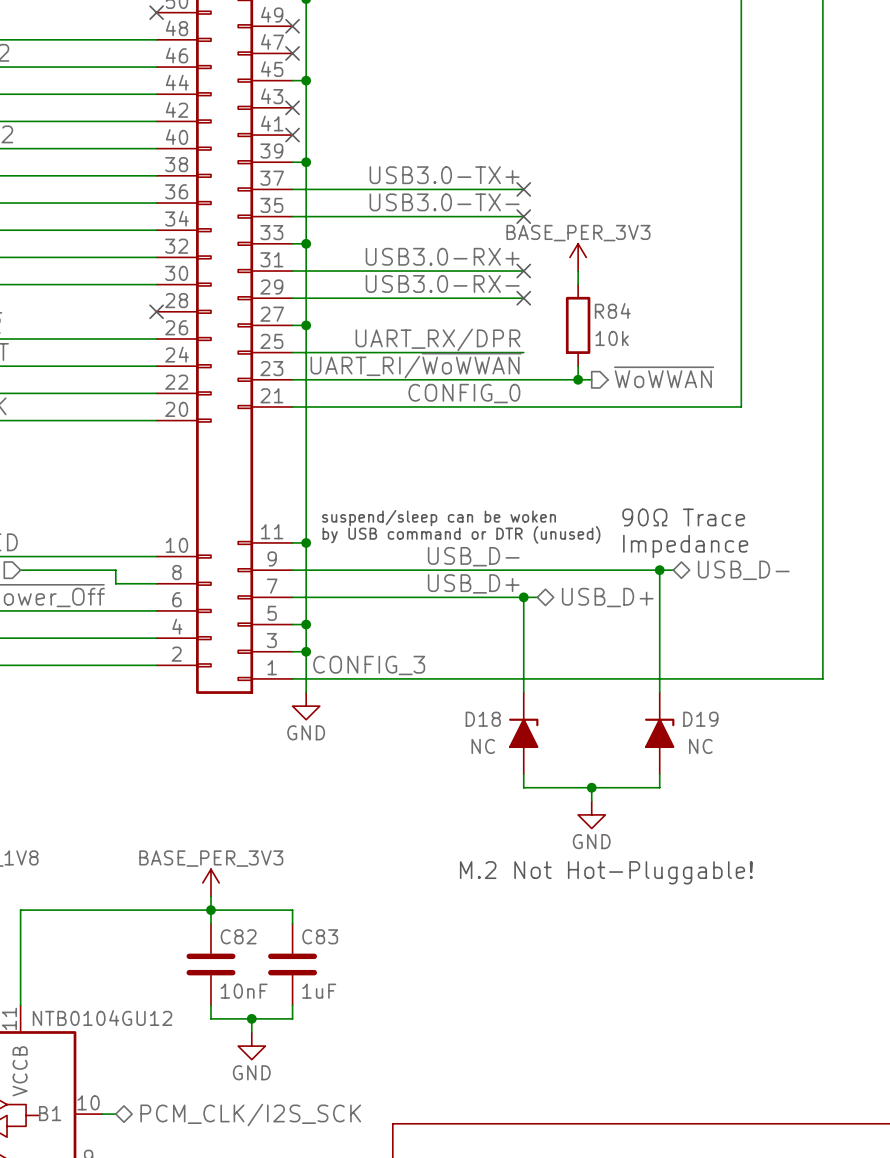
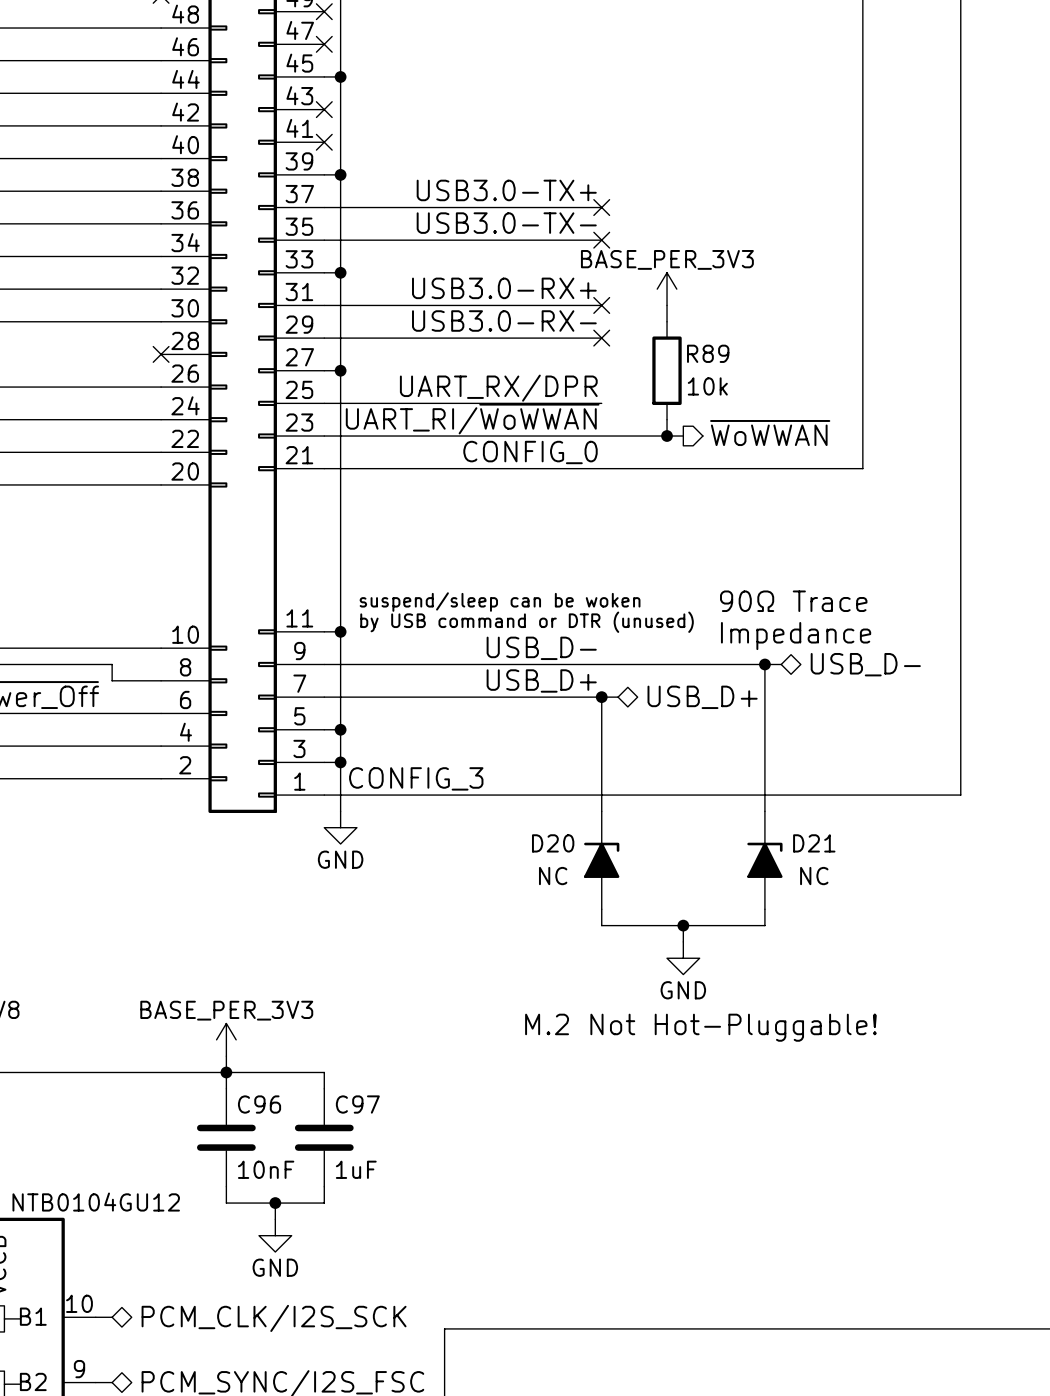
R84 name: R84 (612, 310) -> R89 (708, 353)
D18 name: D18 (483, 719) -> D20 (553, 843)
D19 name: D19 (700, 719) -> D21 (814, 843)
C82 name: C82 (238, 936) -> C96 (259, 1104)
C83 name: C83 (320, 936) -> C97 (357, 1104)

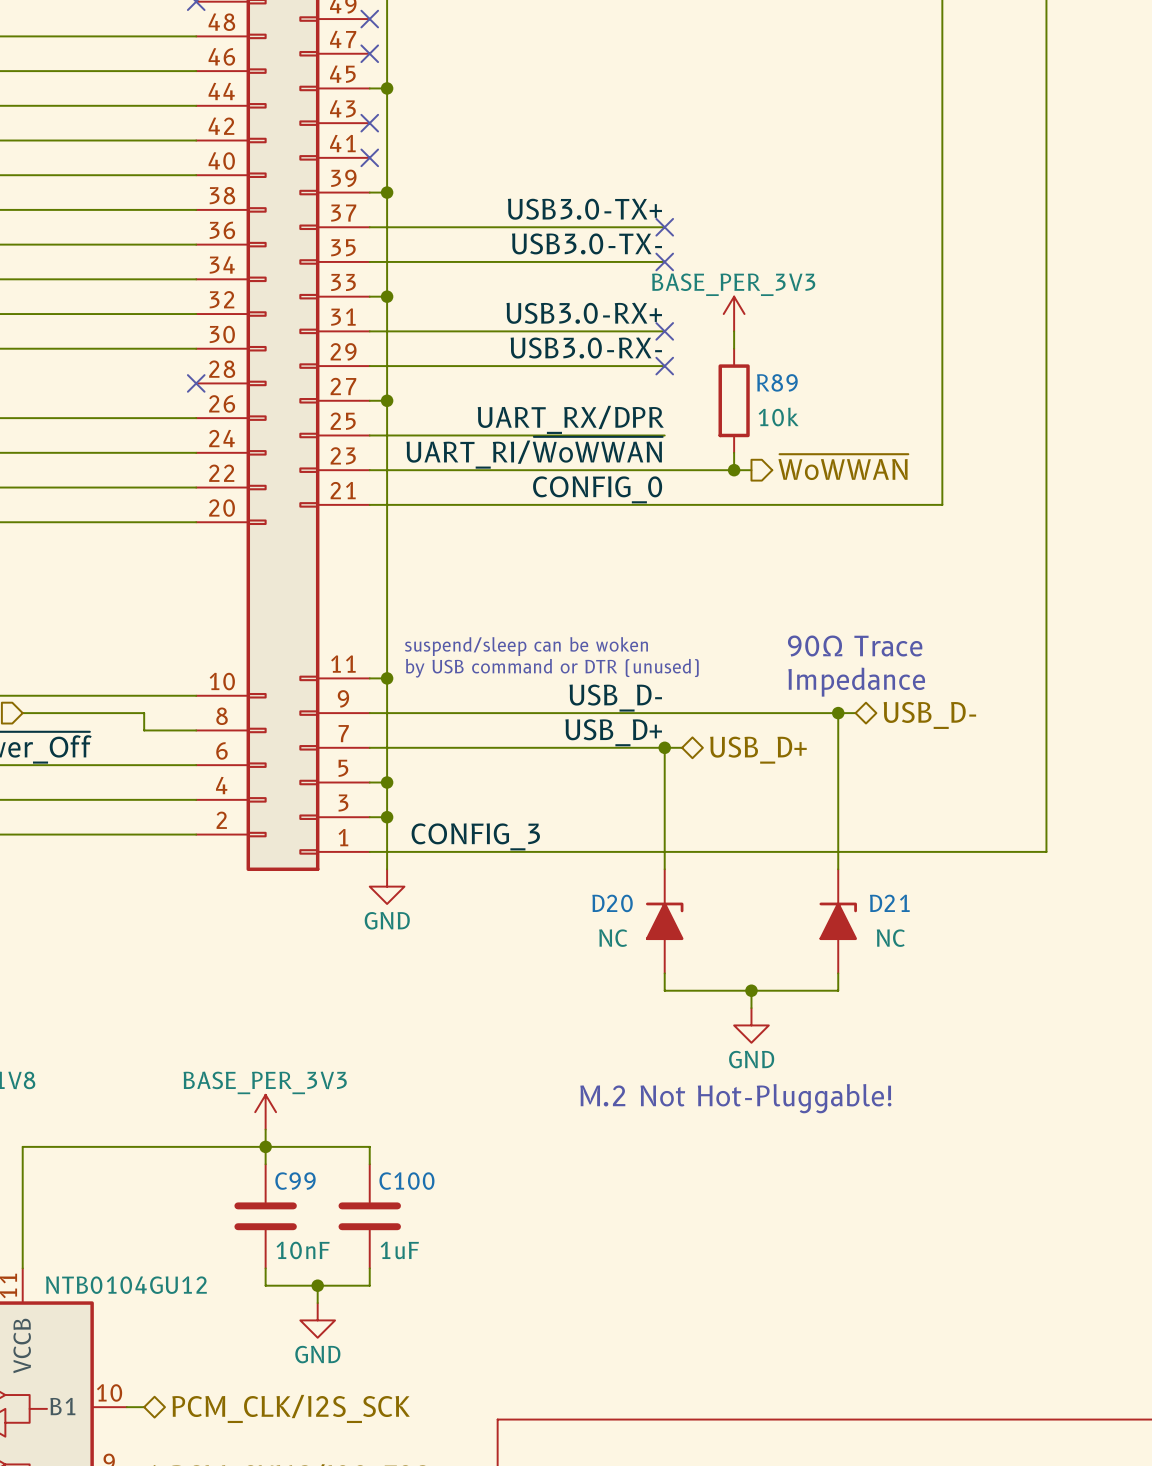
C96 name: C96 (259, 1104) -> C99 (295, 1181)
C97 name: C97 (357, 1104) -> C100 (406, 1181)

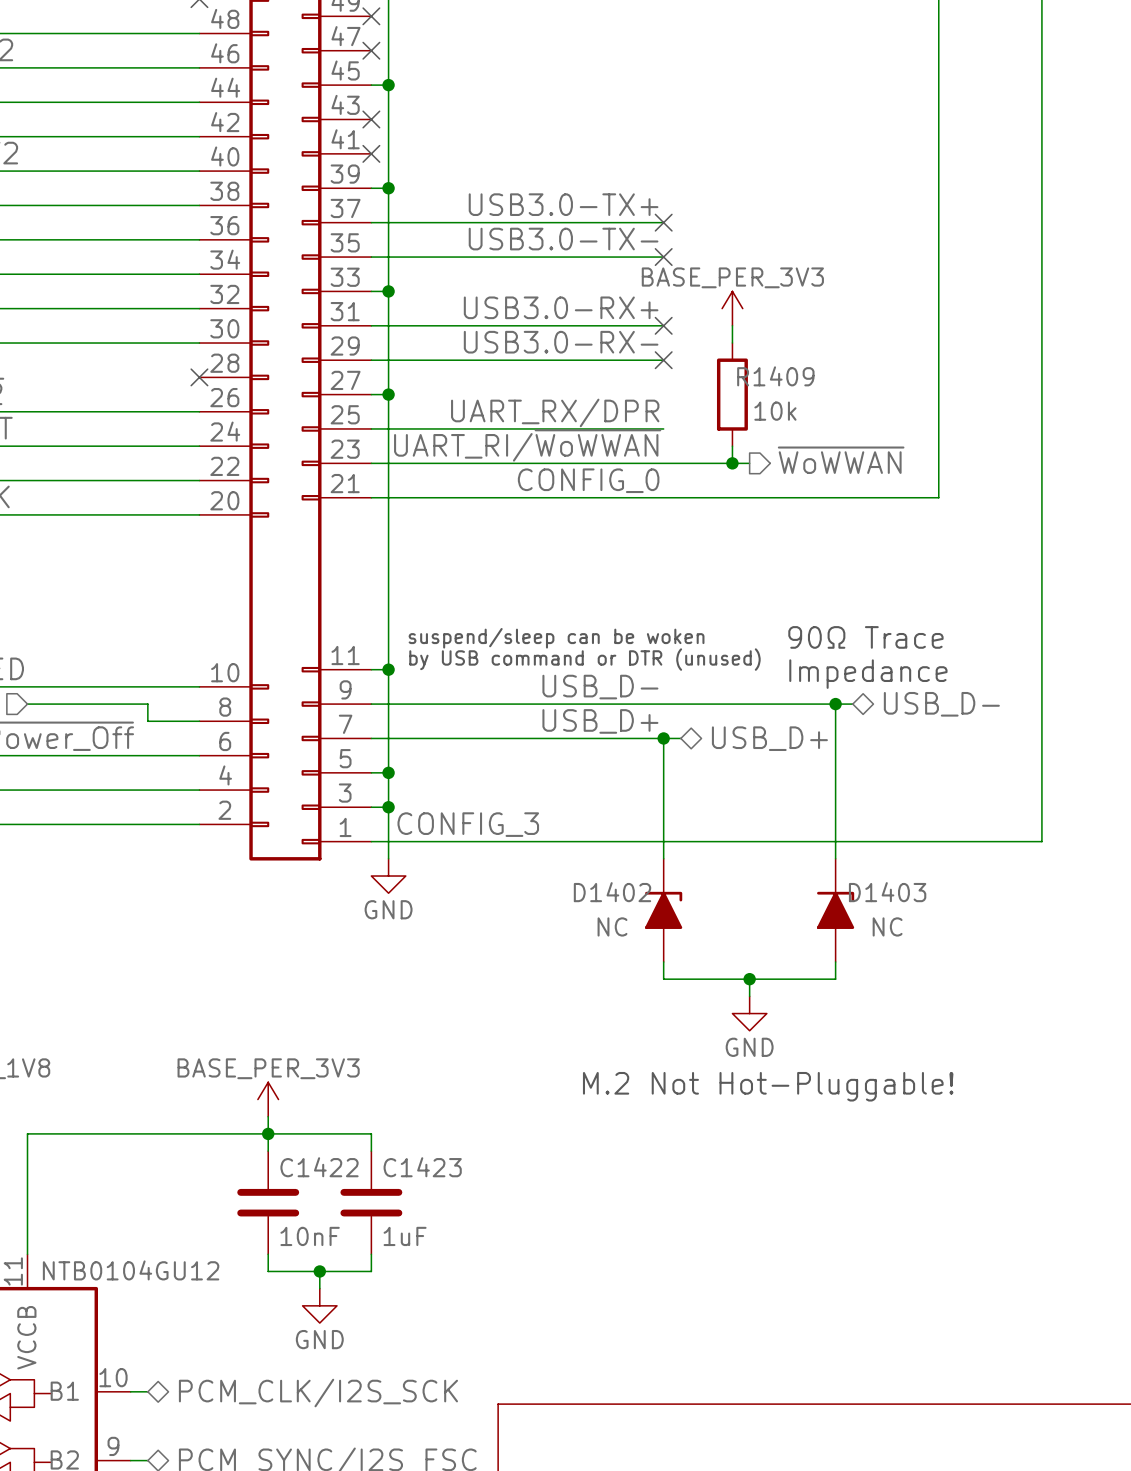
R89 name: R89 (777, 382) -> R1409 (775, 376)
D20 name: D20 (612, 903) -> D1402 (612, 892)
D21 name: D21 (889, 903) -> D1403 (887, 892)
C99 name: C99 (295, 1181) -> C1422 (319, 1167)
C100 name: C100 (406, 1181) -> C1423 (422, 1167)

